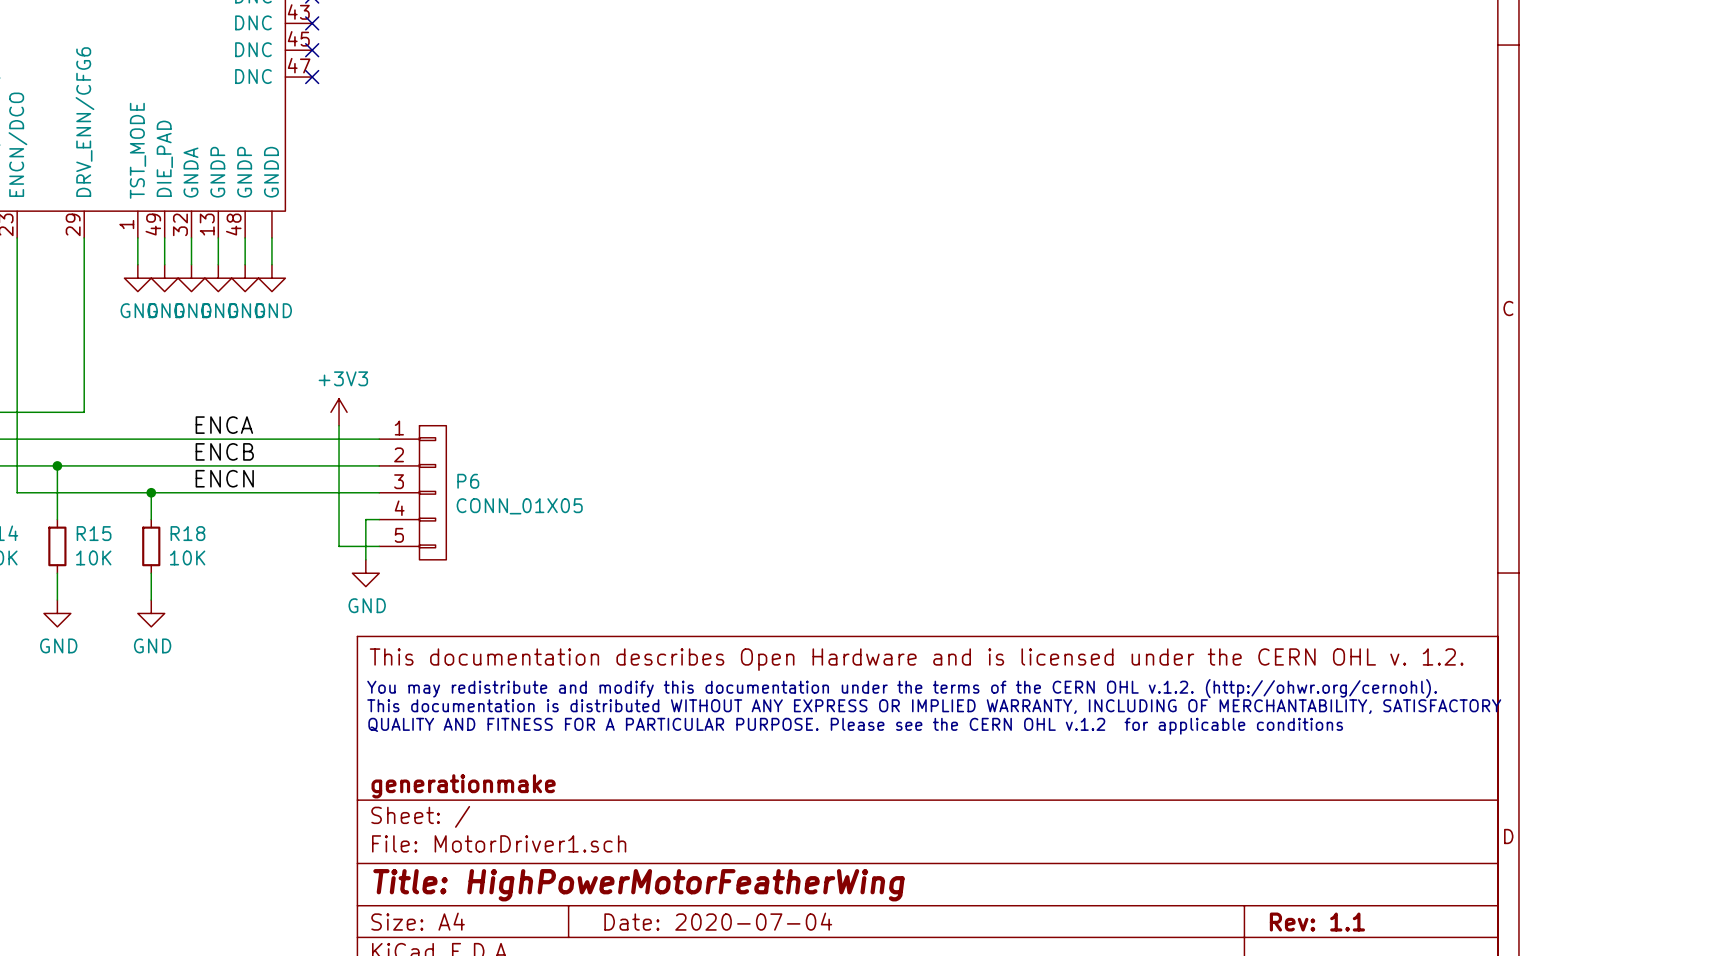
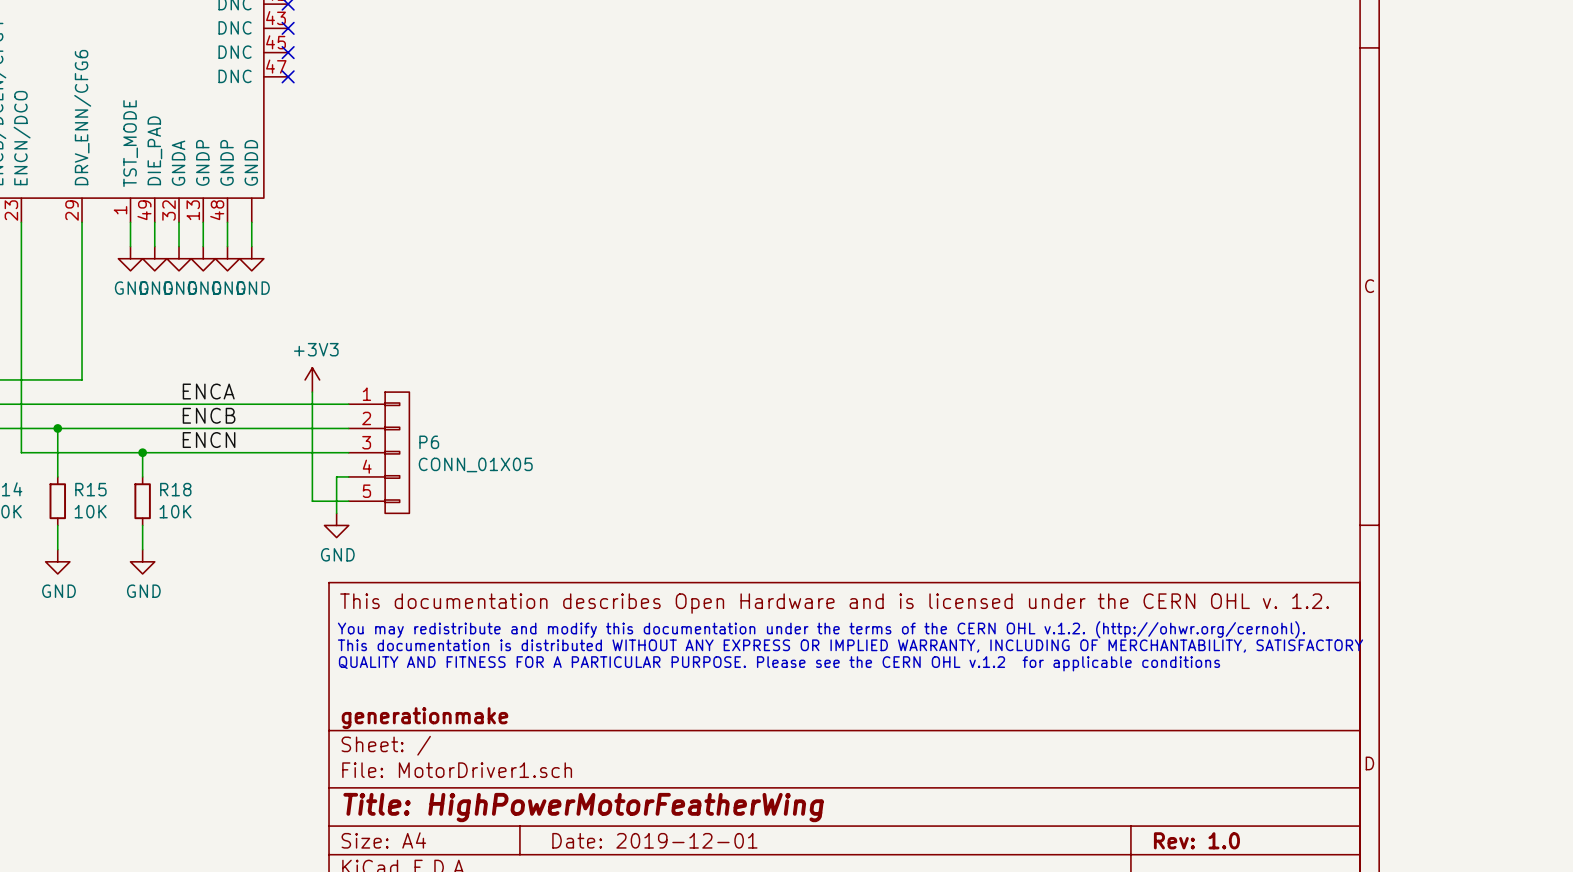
title block: Date: 2020-07-04 (718, 921) -> Date: 2019-12-01 (654, 840)
title block: Rev: 1.1 (1317, 922) -> Rev: 1.0 (1196, 840)

